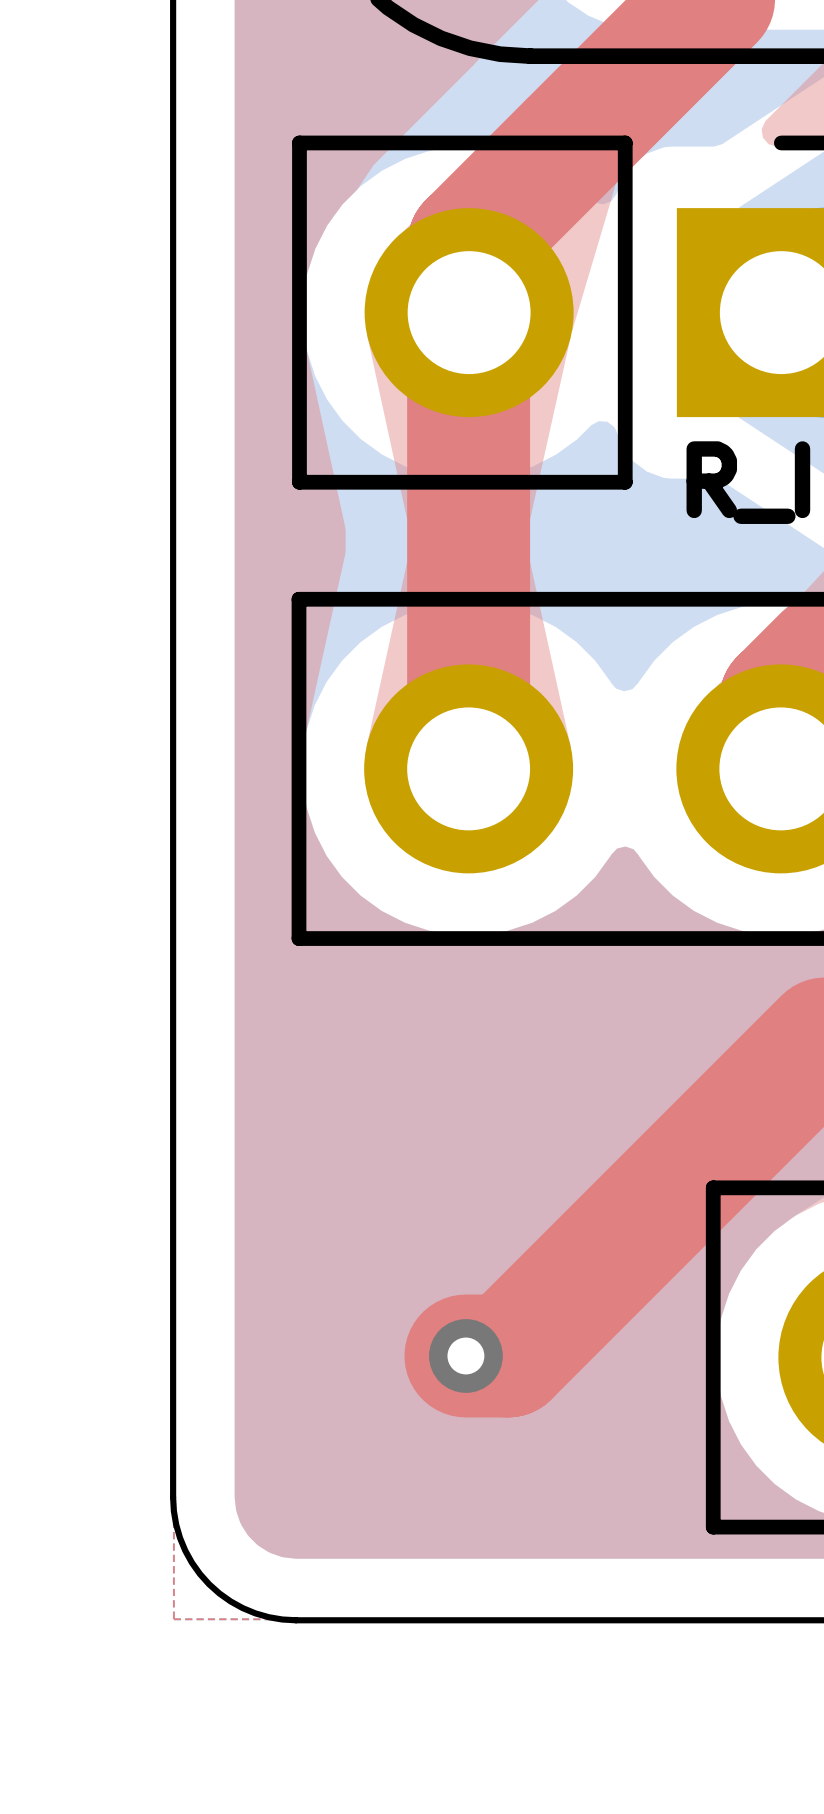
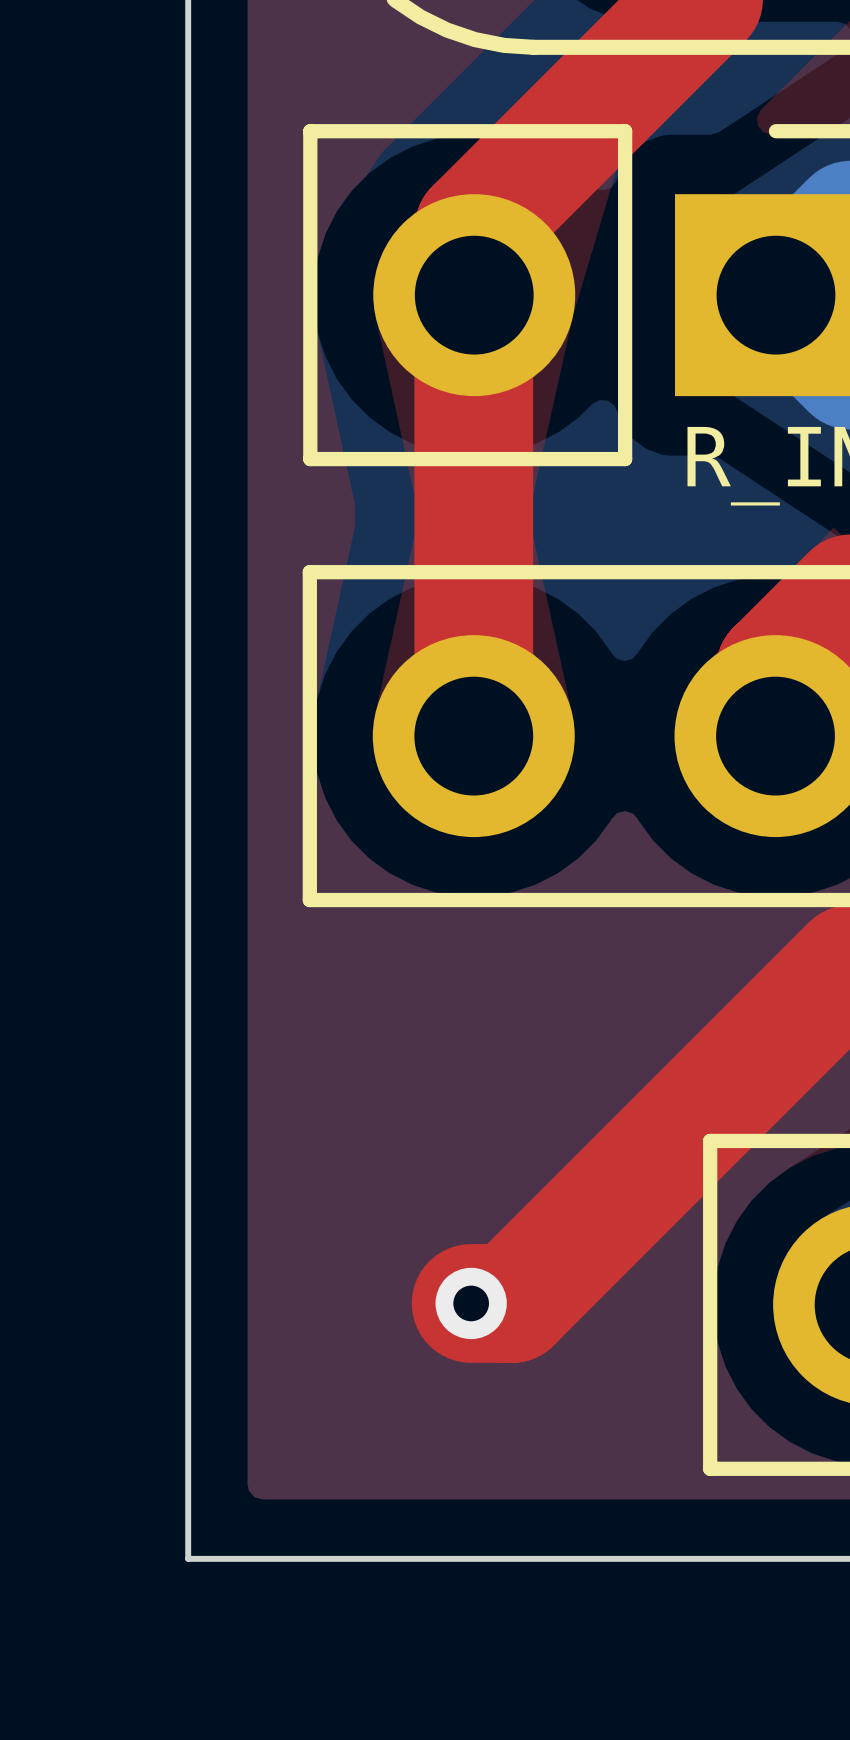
board edge: (173, 1497) (173, 1511) (180, 1537) (191, 1562) (209, 1584) (219, 1593) (242, 1608) (268, 1617) (296, 1620) -> (188, 1440) (188, 1558) (306, 1558)

